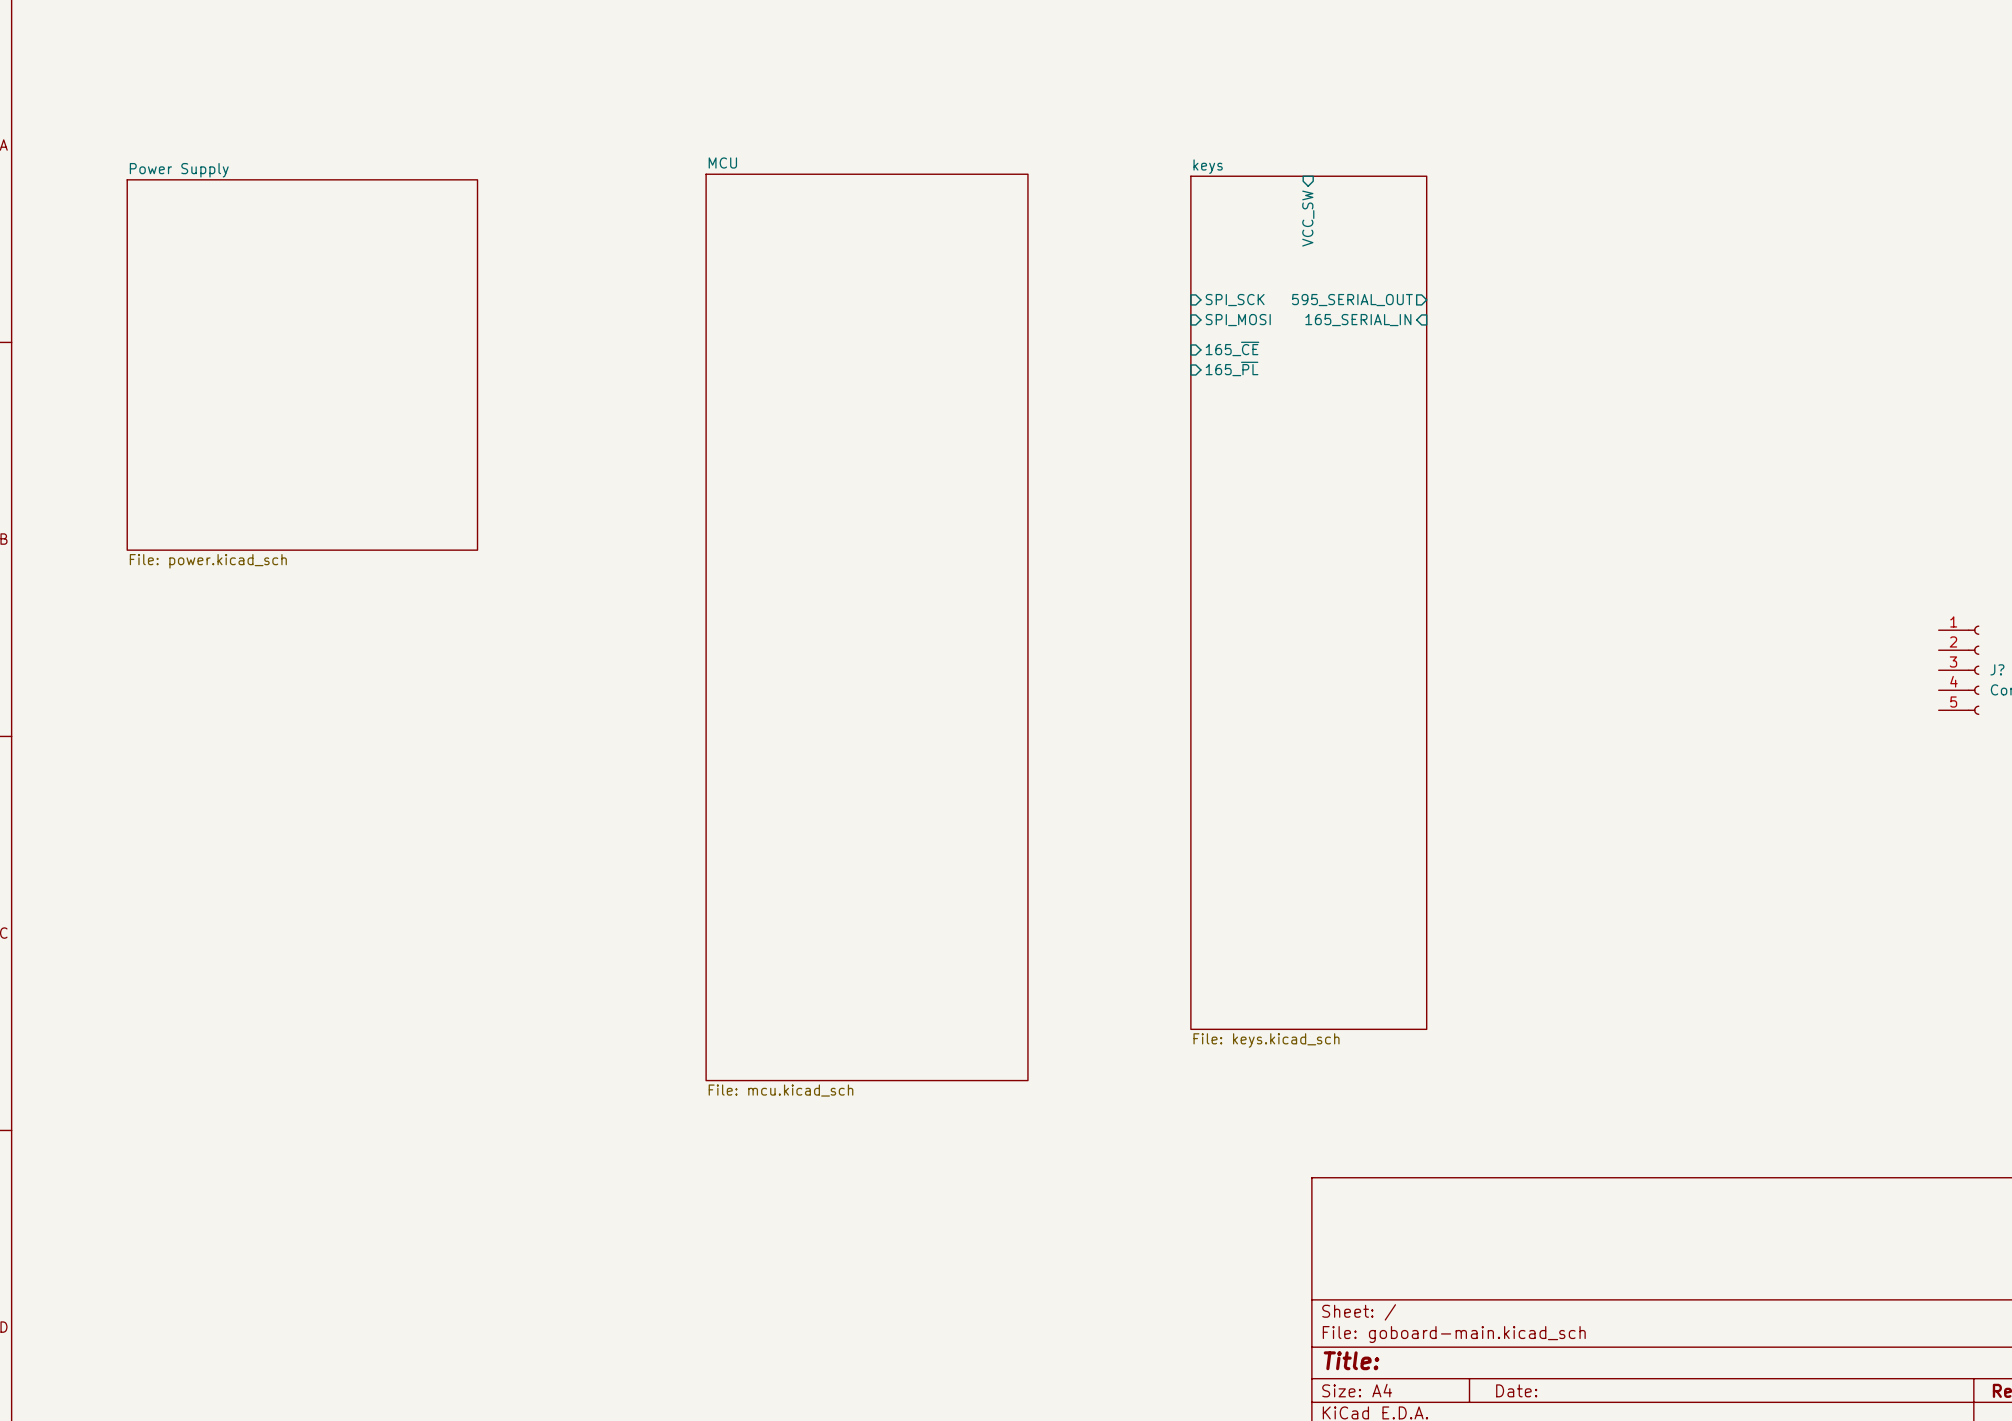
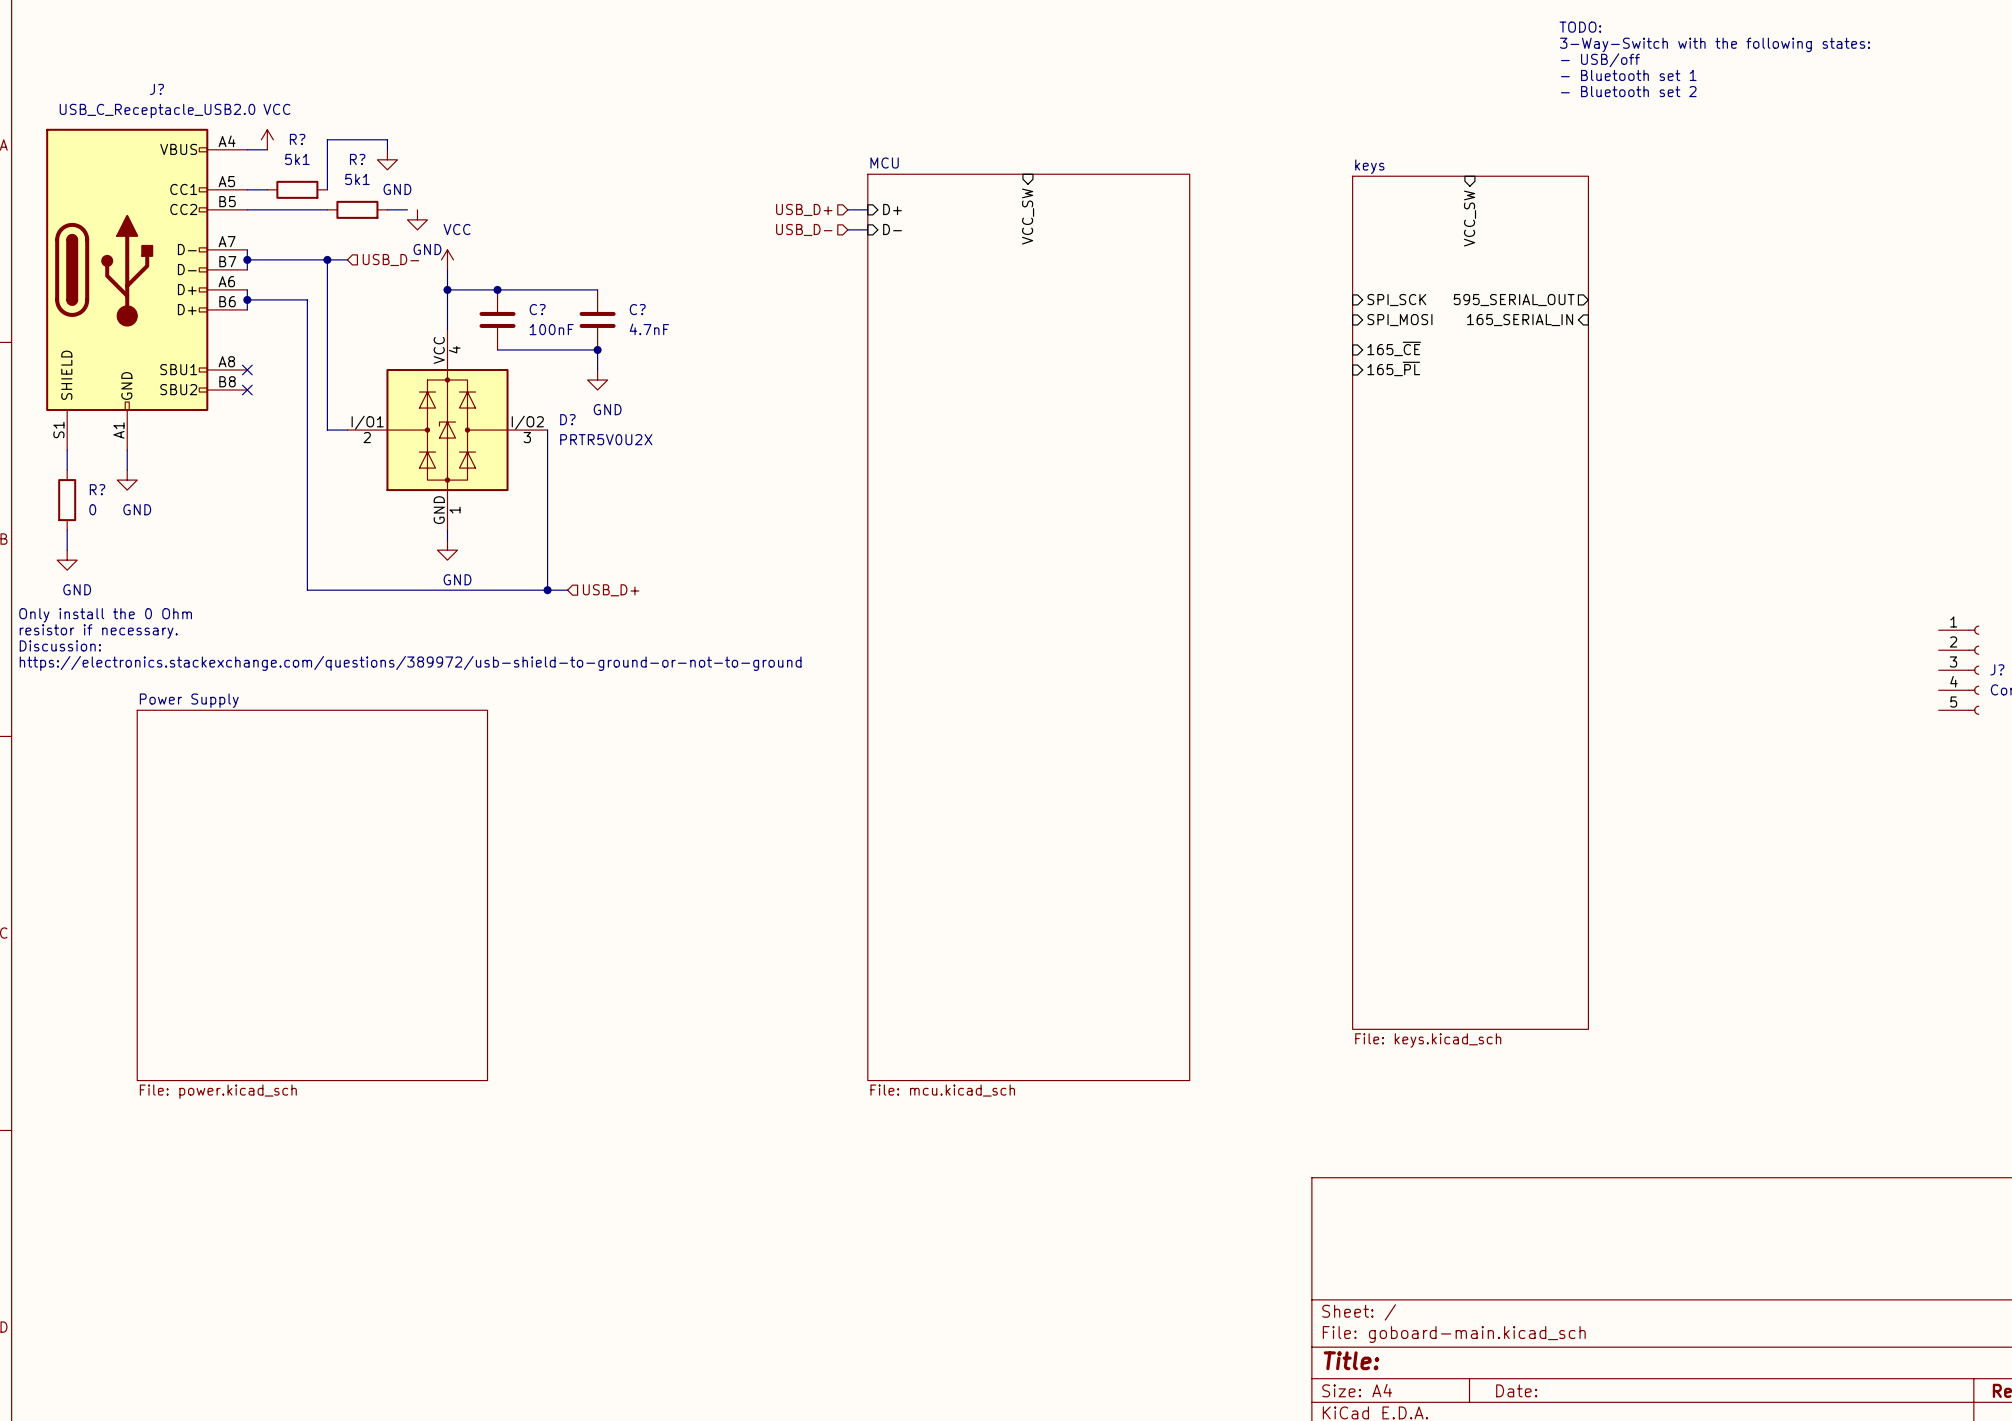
text: none -> TODO: (1580, 27)
text: none -> 3-Way-Switch with the following states: (1715, 44)
text: none -> - USB/off (1600, 60)
text: none -> - Bluetooth set 1 (1628, 75)
text: none -> - Bluetooth set 2 (1628, 91)
power symbol: none -> VCC (267, 139)
wire: none -> (247, 149) (267, 149)
wire: none -> (387, 149) (387, 139) (327, 139) (327, 189)
power symbol: none -> GND (387, 159)
wire: none -> (247, 189) (267, 189)
R?: none -> 5k1 (297, 189)
wire: none -> (247, 209) (327, 209)
R?: none -> 5k1 (357, 209)
wire: none -> (387, 209) (407, 209)
hierarchical label: none -> USB_D+ (804, 209)
wire: none -> (847, 209) (867, 209)
sheet pin: none -> D+ (892, 209)
sheet pin: none -> VCC_SW (1028, 216)
sheet pin: VCC_SW (1308, 218) -> none
sheet pin: none -> VCC_SW (1470, 218)
power symbol: none -> GND (417, 219)
hierarchical label: none -> USB_D- (804, 229)
wire: none -> (847, 229) (867, 229)
sheet pin: none -> D- (892, 229)
wire: none -> (247, 249) (247, 269)
wire: none -> (247, 259) (347, 259)
junction: none -> (247, 259)
wire: none -> (327, 259) (327, 430) (347, 430)
junction: none -> (327, 259)
power symbol: none -> VCC (447, 259)
hierarchical label: none -> USB_D- (390, 260)
wire: none -> (447, 269) (447, 329)
J?: none -> USB_C_Receptacle_USB2.0 (146, 289)
wire: none -> (247, 289) (247, 309)
wire: none -> (447, 289) (597, 289)
junction: none -> (447, 289)
junction: none -> (497, 289)
wire: none -> (247, 299) (307, 299) (307, 590) (567, 590)
junction: none -> (247, 299)
sheet pin position: SPI_SCK (1235, 300) -> SPI_SCK (1396, 300)
sheet pin position: 595_SERIAL_OUT (1352, 300) -> 595_SERIAL_OUT (1514, 300)
C?: none -> 100nF (497, 319)
C?: none -> 4.7nF (597, 319)
sheet pin position: SPI_MOSI (1238, 320) -> SPI_MOSI (1399, 320)
sheet pin position: 165_SERIAL_IN (1358, 320) -> 165_SERIAL_IN (1520, 320)
sheet pin position: 165_~{CE} (1232, 348) -> 165_~{CE} (1394, 348)
wire: none -> (497, 349) (597, 349) (597, 369)
junction: none -> (597, 349)
sheet Power Supply: File: power.kicad_sch (302, 364) -> none
sheet pin position: 165_~{PL} (1232, 368) -> 165_~{PL} (1393, 368)
no-connect mark: none -> (247, 369)
power symbol: none -> GND (597, 380)
no-connect mark: none -> (247, 390)
D?: none -> PRTR5V0U2X (447, 430)
wire: none -> (547, 430) (547, 590)
wire: none -> (67, 450) (67, 470)
power symbol: none -> GND (127, 480)
R?: none -> 0 (67, 500)
wire: none -> (67, 530) (67, 550)
wire: none -> (447, 530) (447, 540)
power symbol: none -> GND (447, 550)
power symbol: none -> GND (67, 560)
junction: none -> (547, 590)
hierarchical label: none -> USB_D+ (611, 590)
sheet keys position: (1308, 602) -> (1470, 602)
text: none -> Only install the 0 Ohm (105, 615)
sheet MCU position: (867, 627) -> (1028, 627)
text: none -> resistor if necessary. (98, 631)
text: none -> Discussion: (60, 645)
text: none -> https://electronics.stackexchange.com/questions/389972/usb-shield-to-ground-or-not-to-ground (410, 663)
sheet Power Supply: none -> File: power.kicad_sch (312, 895)

